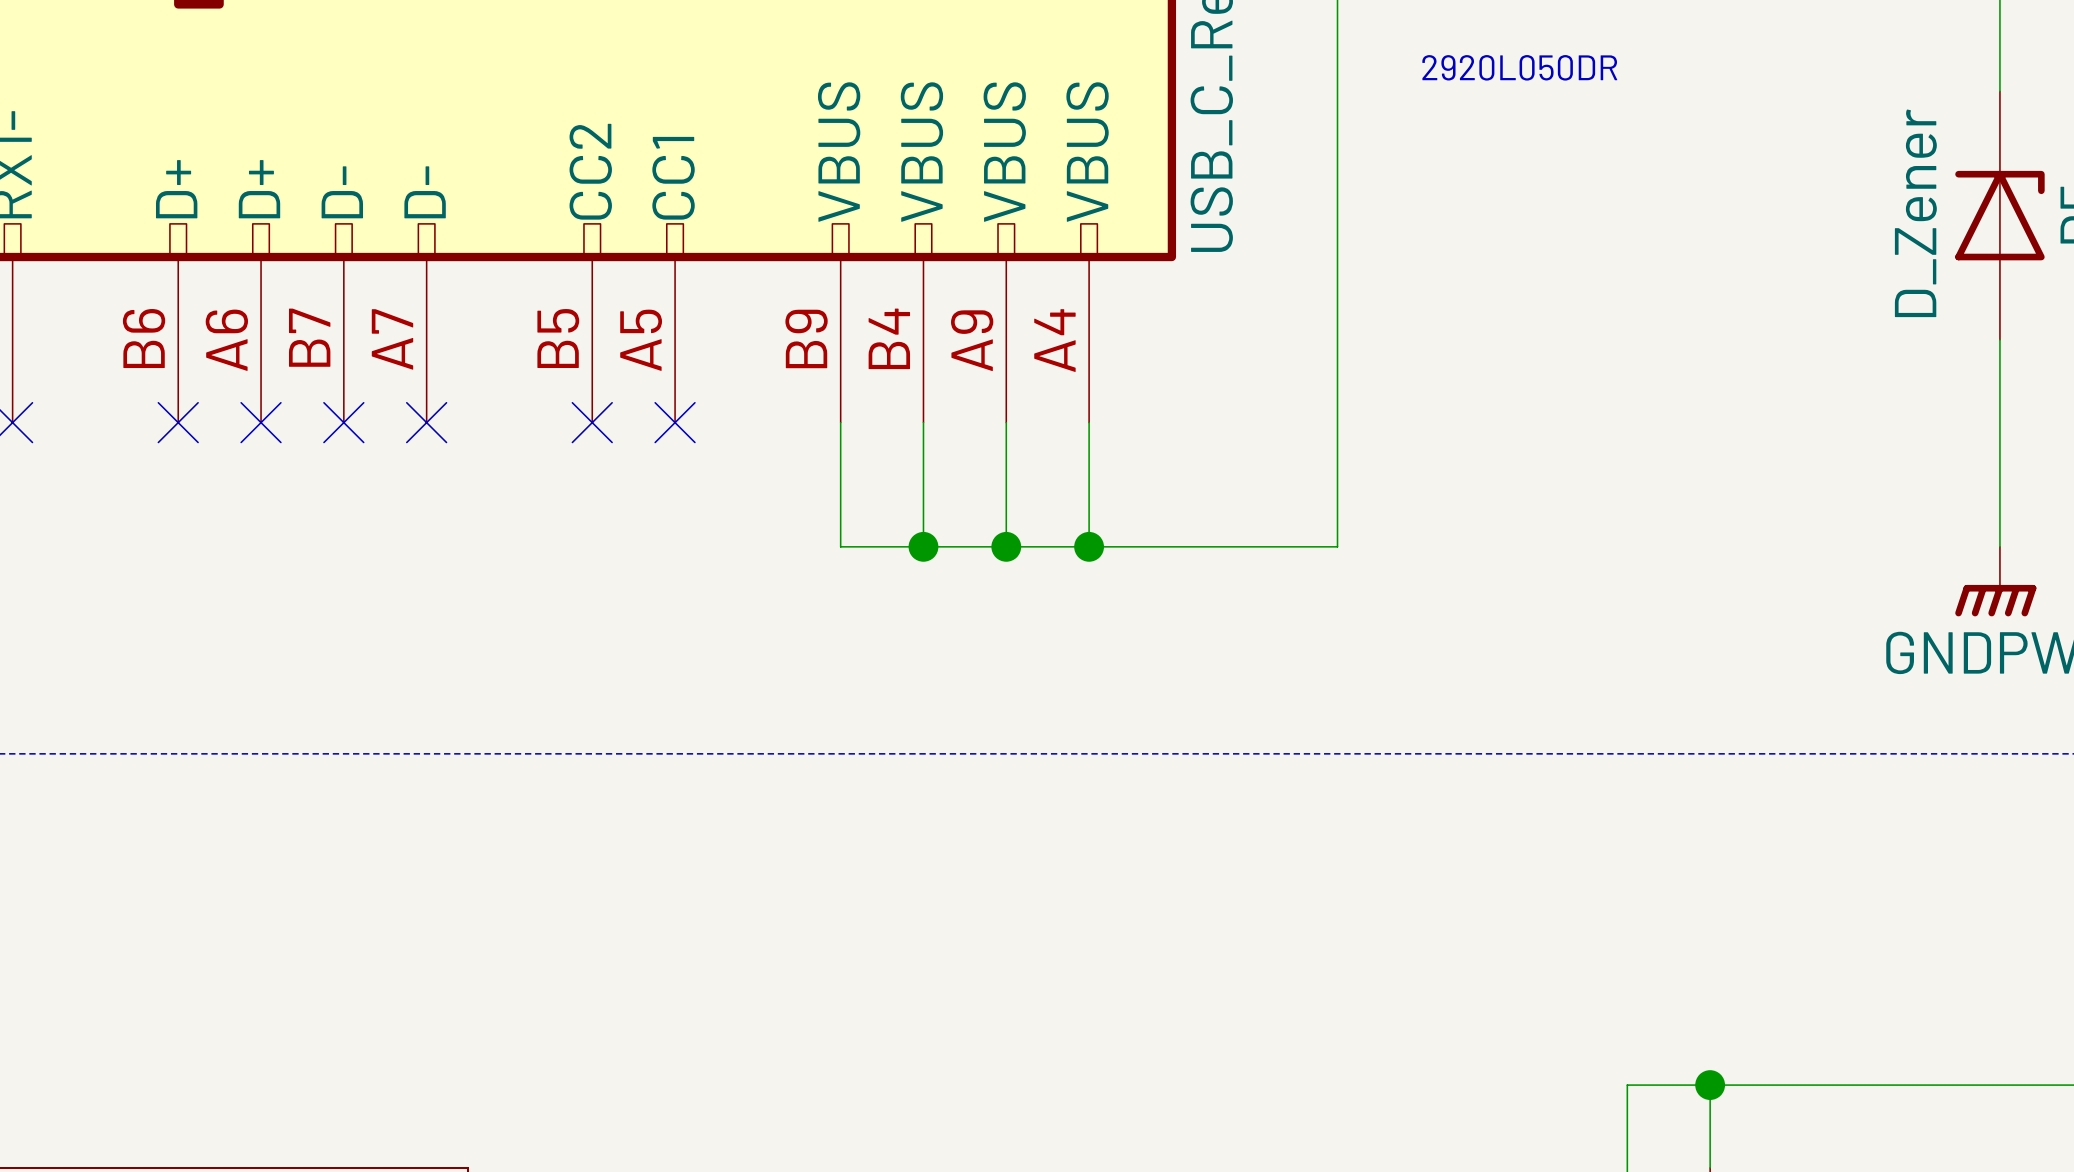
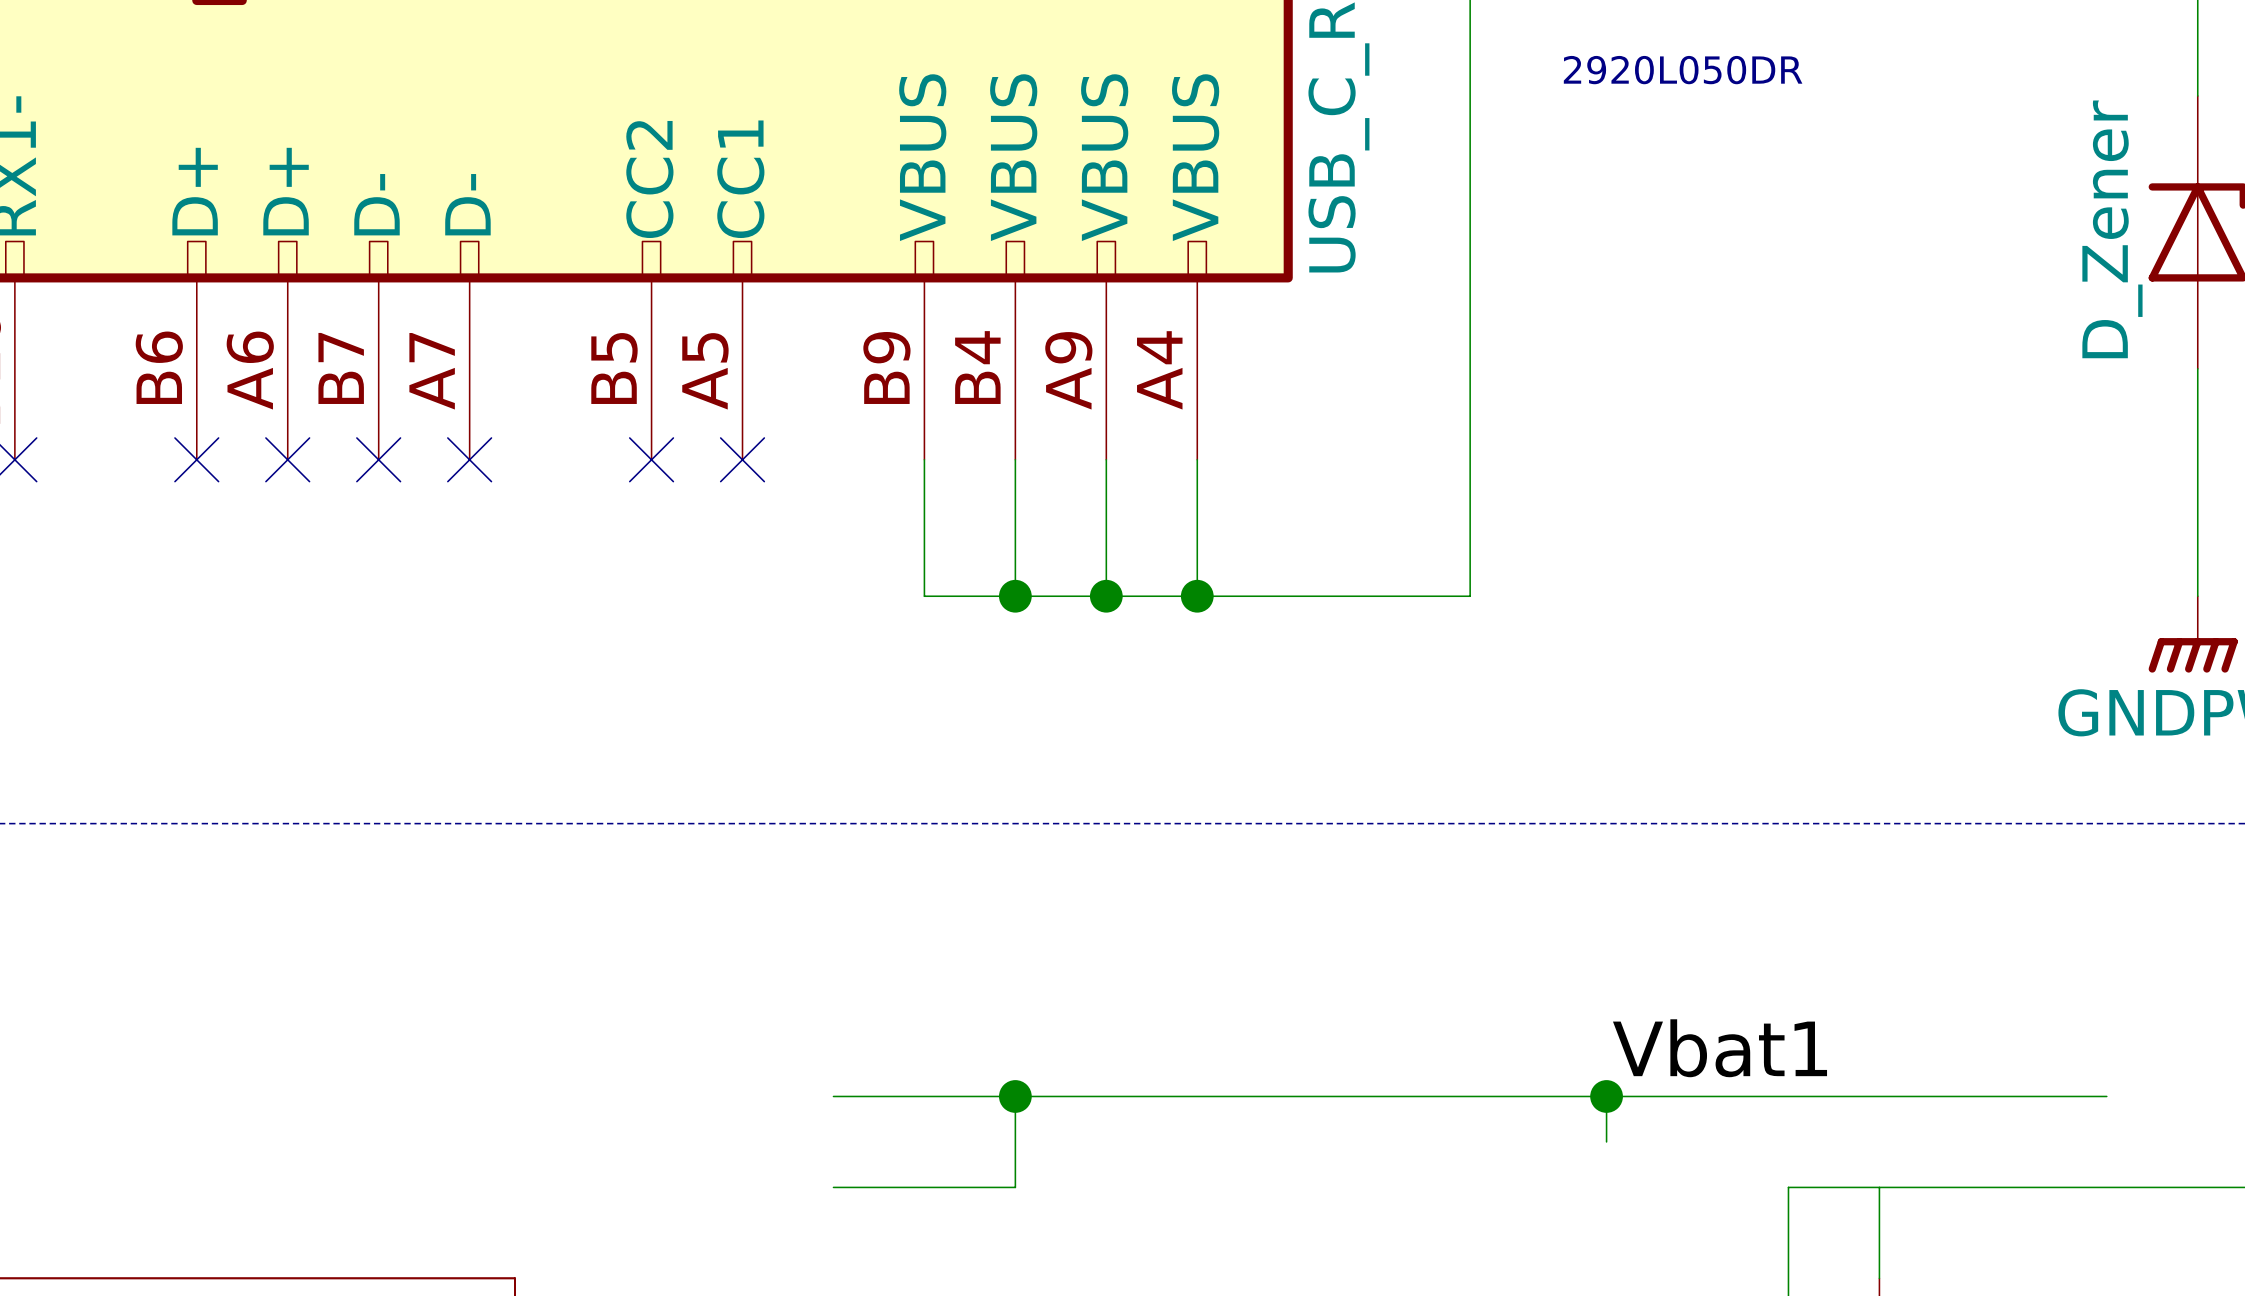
label: none -> Vbat1 (1720, 1048)
wire: none -> (833, 1096) (2106, 1096)
wire: none -> (1015, 1096) (1015, 1187) (833, 1187)
junction: none -> (1015, 1096)
wire: none -> (1606, 1096) (1606, 1141)
junction: none -> (1606, 1096)
junction: (1710, 1085) -> none

